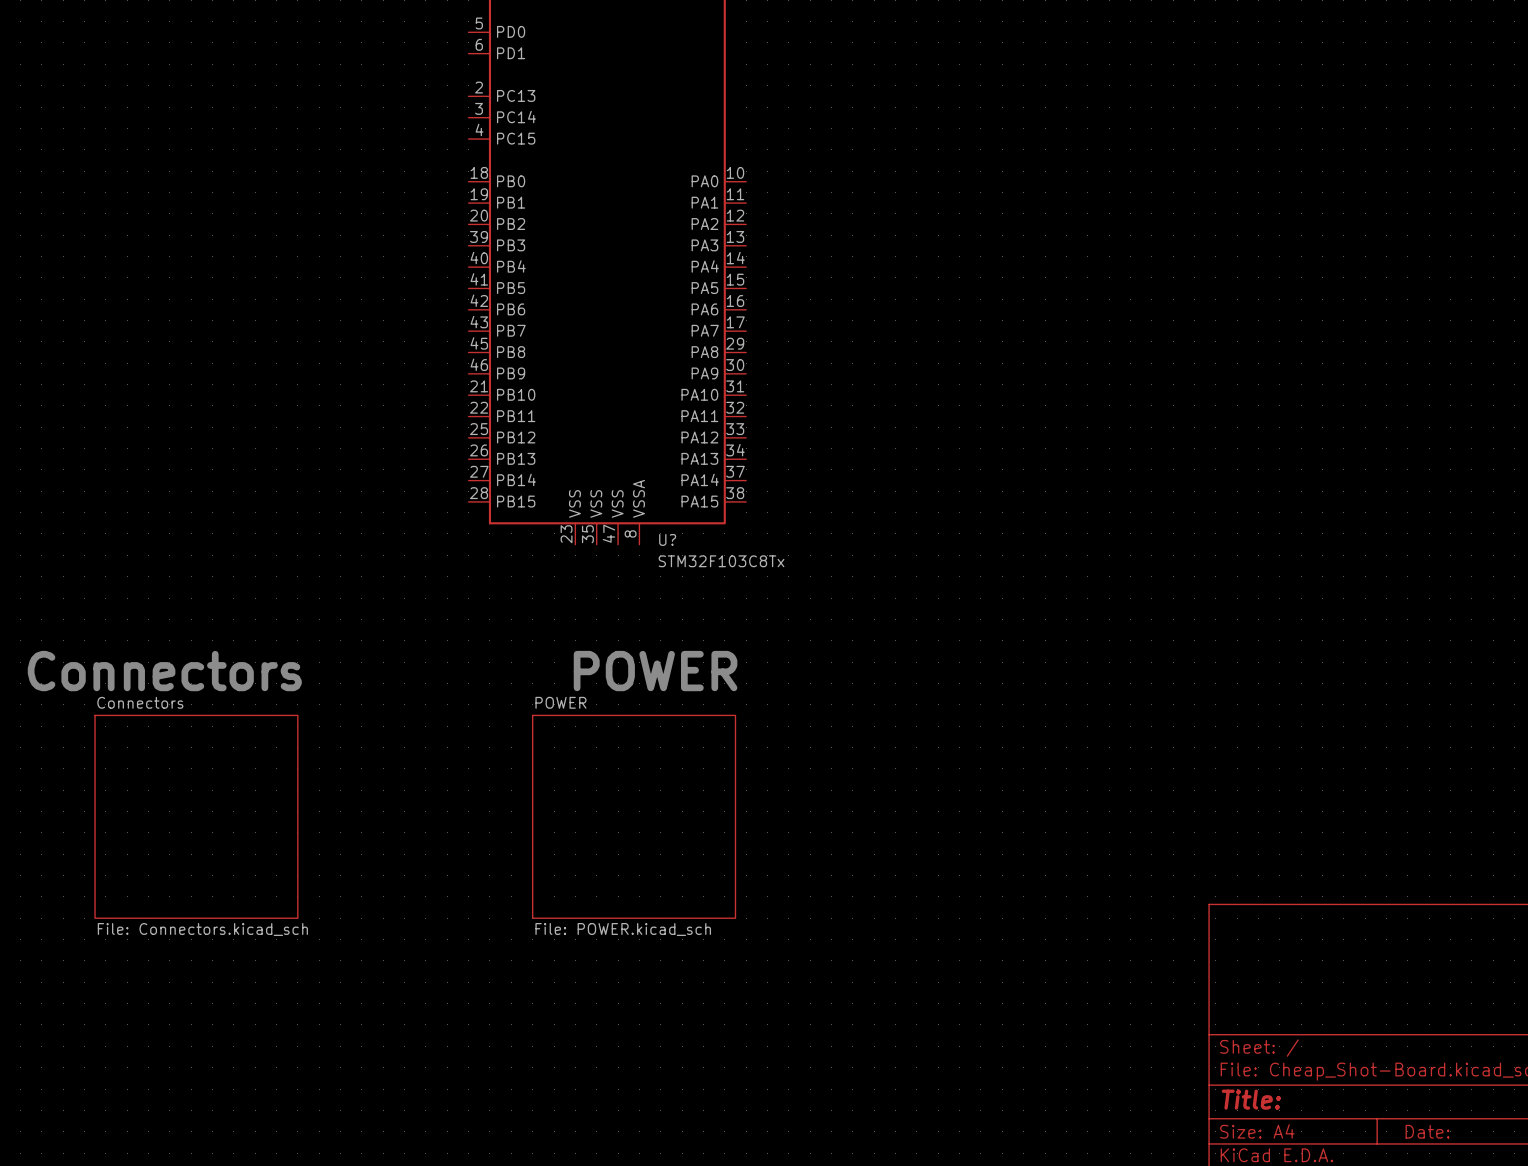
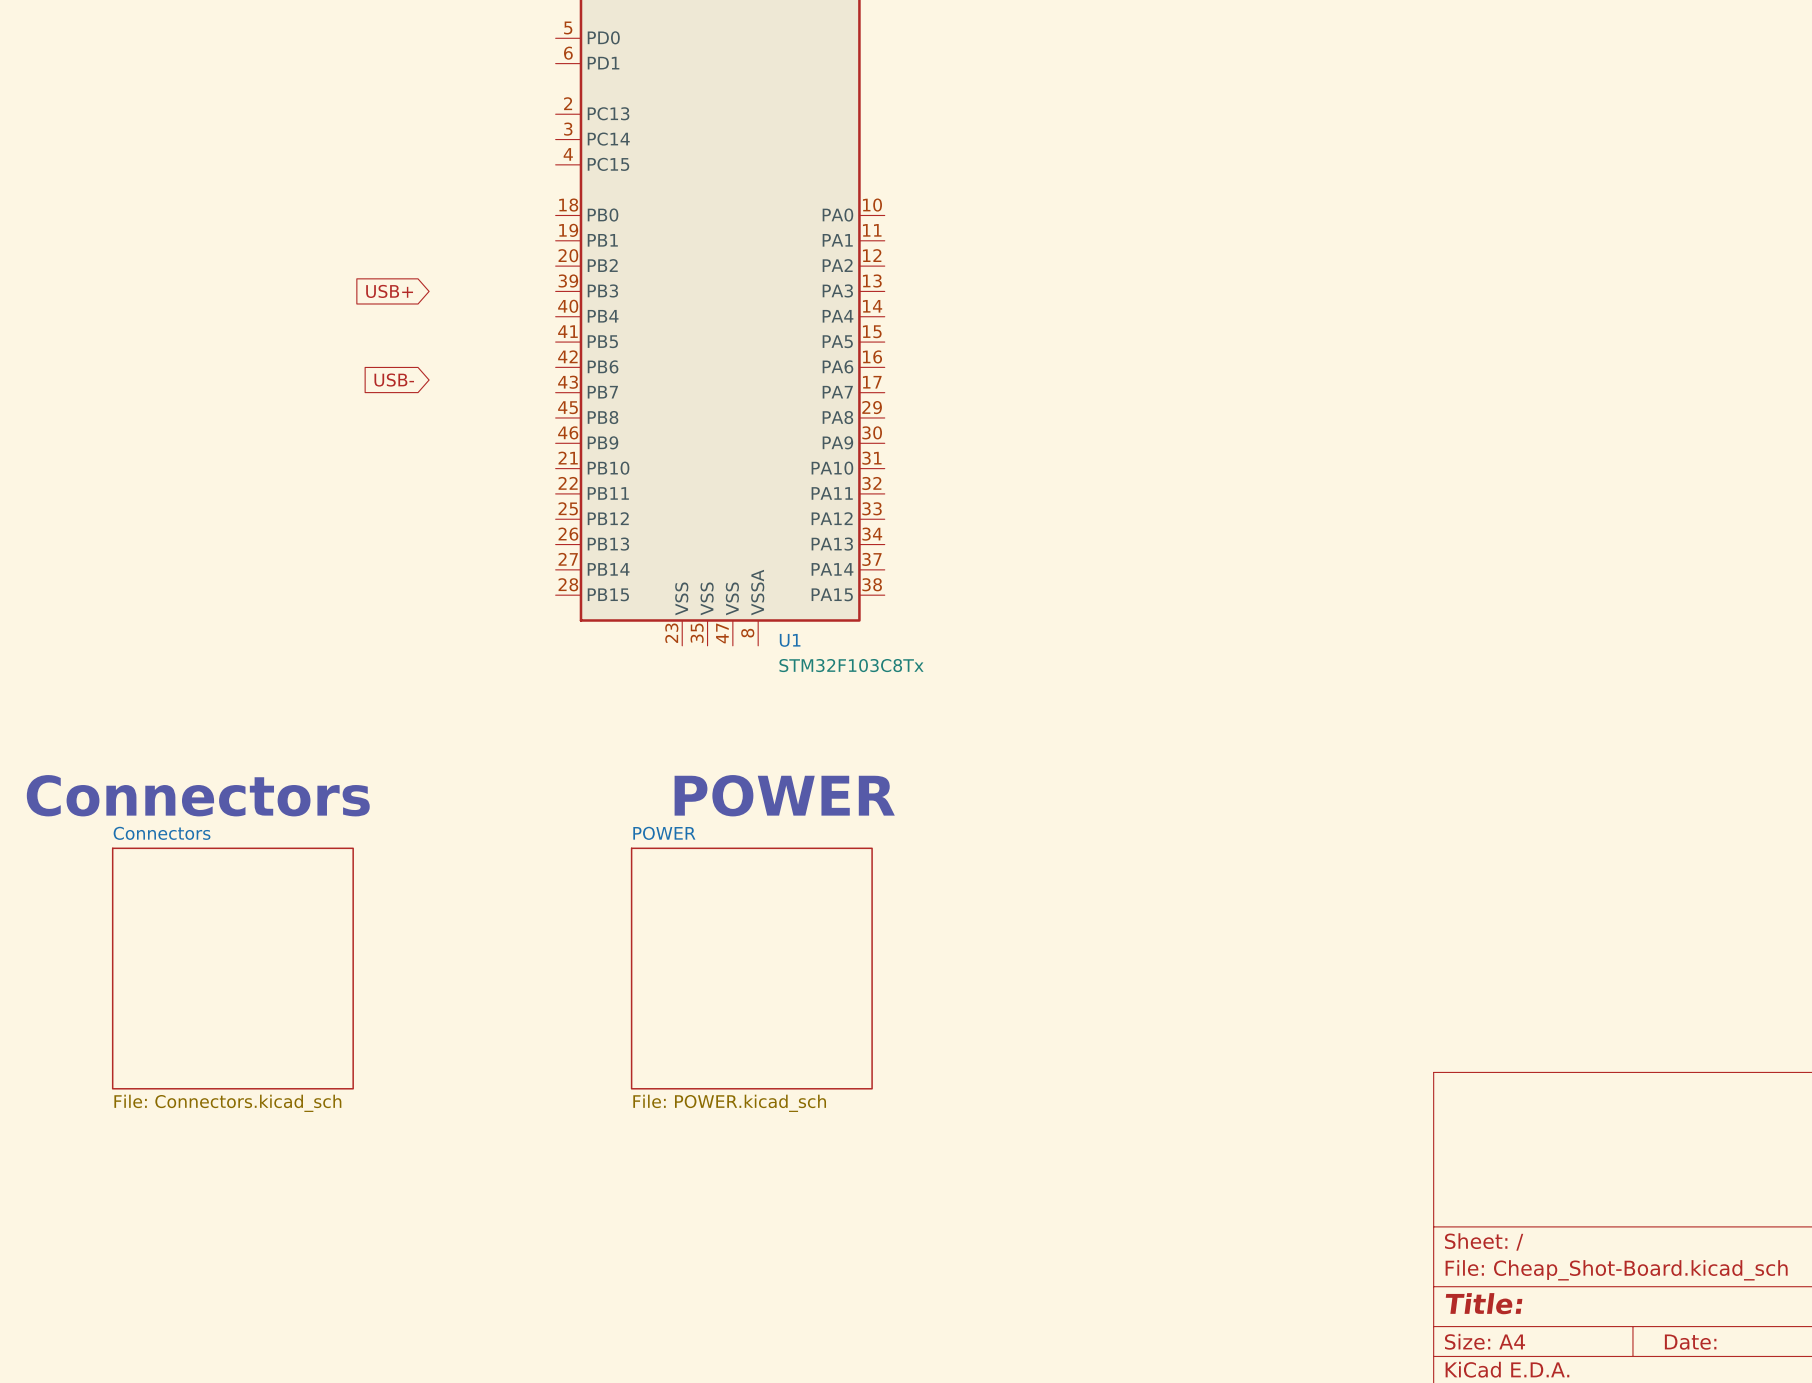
global label: none -> USB+ (389, 291)
global label: none -> USB- (394, 380)
U? name: U? (667, 539) -> U1 (790, 640)

